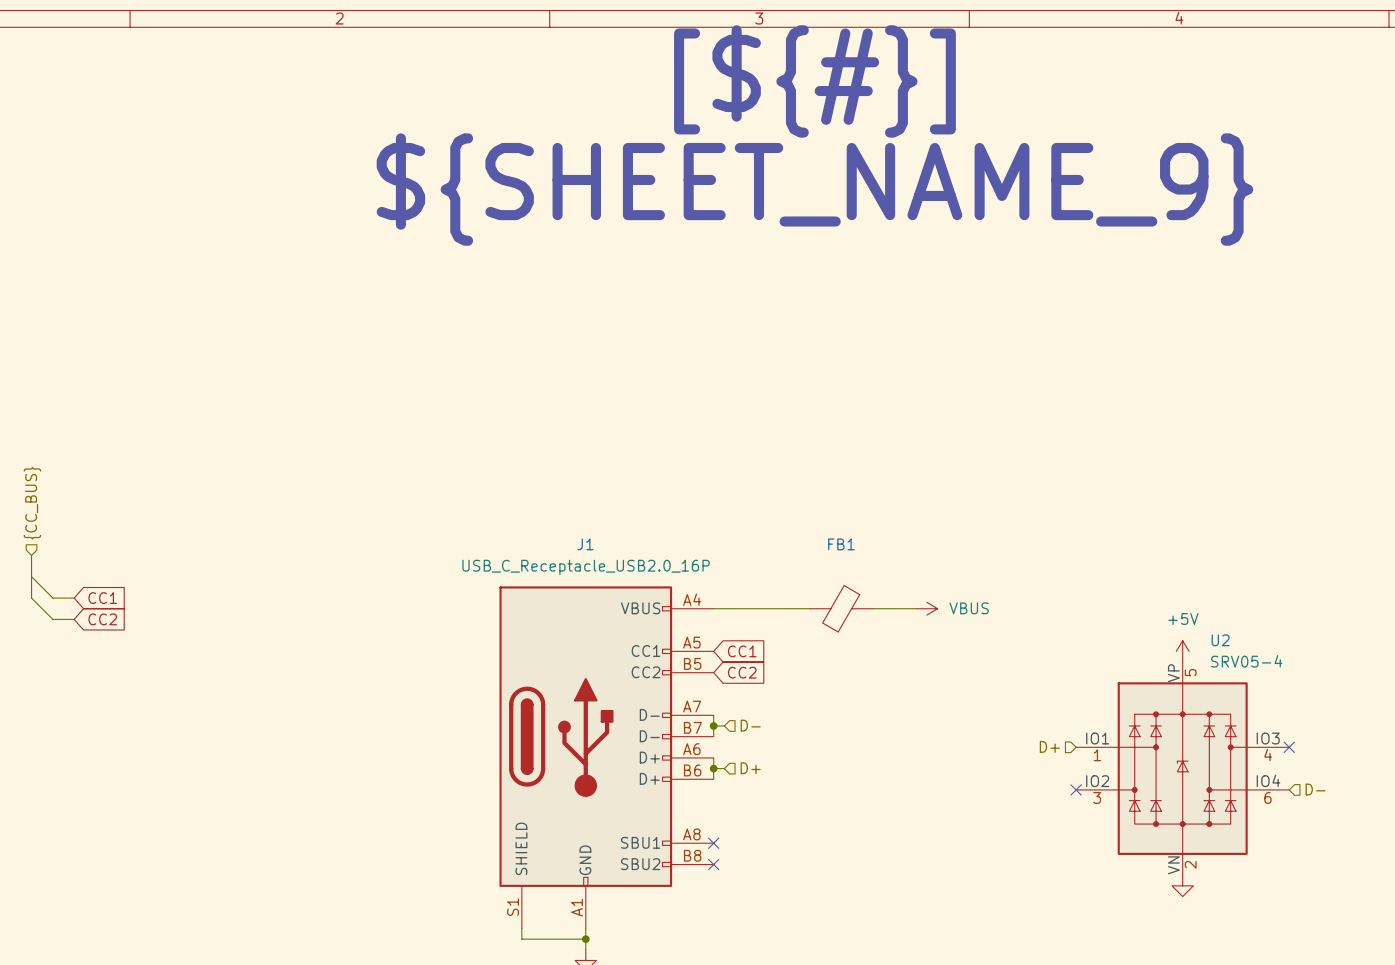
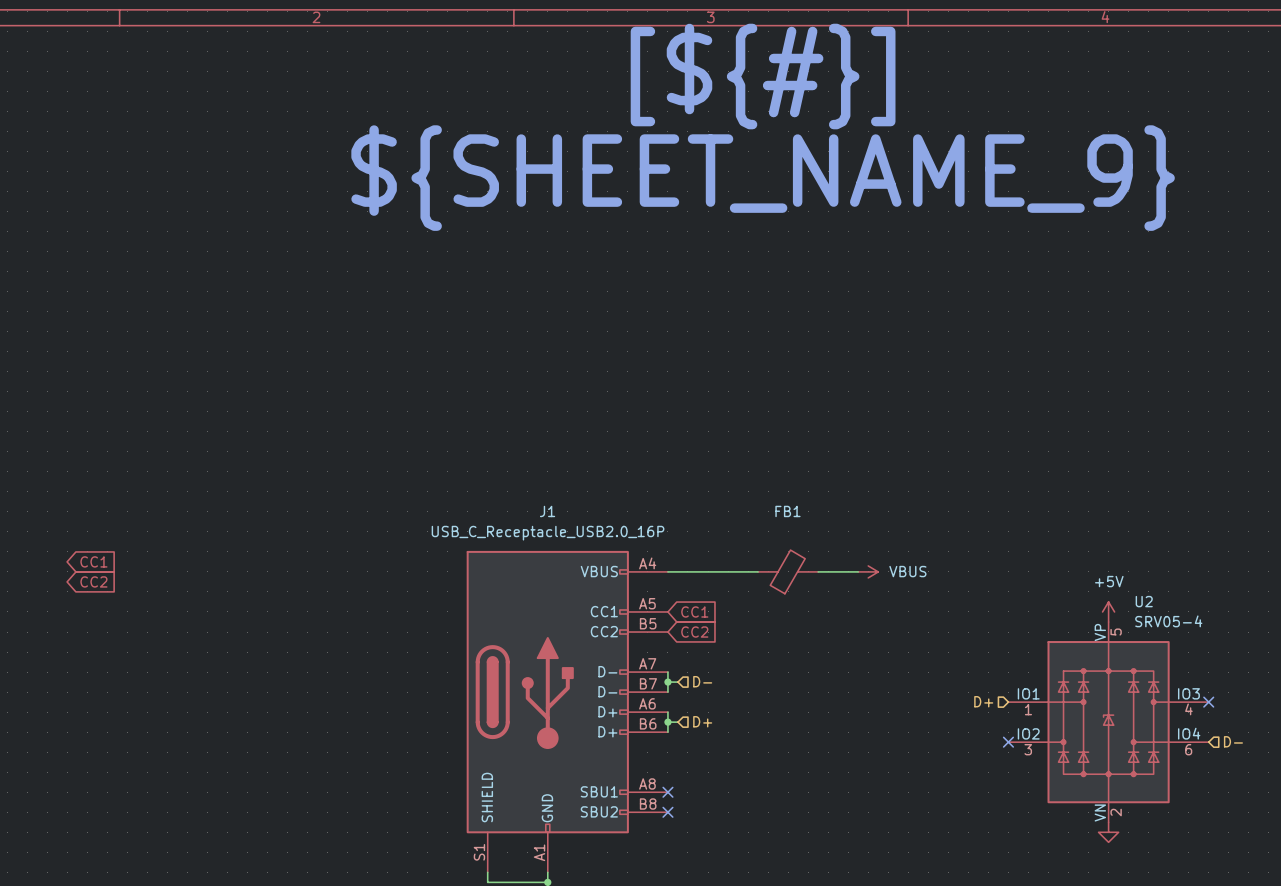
hierarchical label: {CC_BUS} (32, 503) -> none
bus: (31, 555) (31, 598) -> none
wire: (31, 576) (52, 598) (74, 598) -> none
wire: (31, 598) (52, 619) (74, 619) -> none

